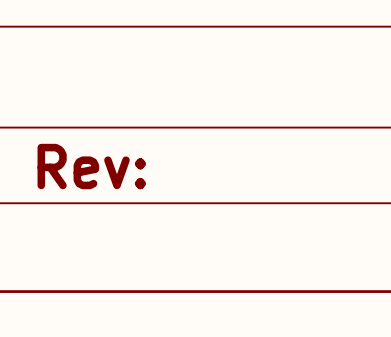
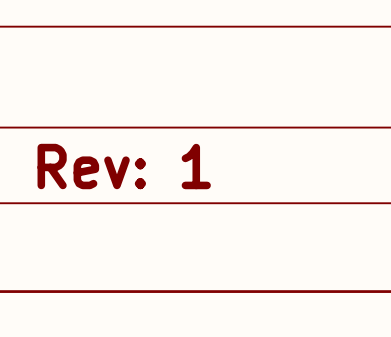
title block: Rev: (91, 166) -> Rev: 1 (124, 166)

